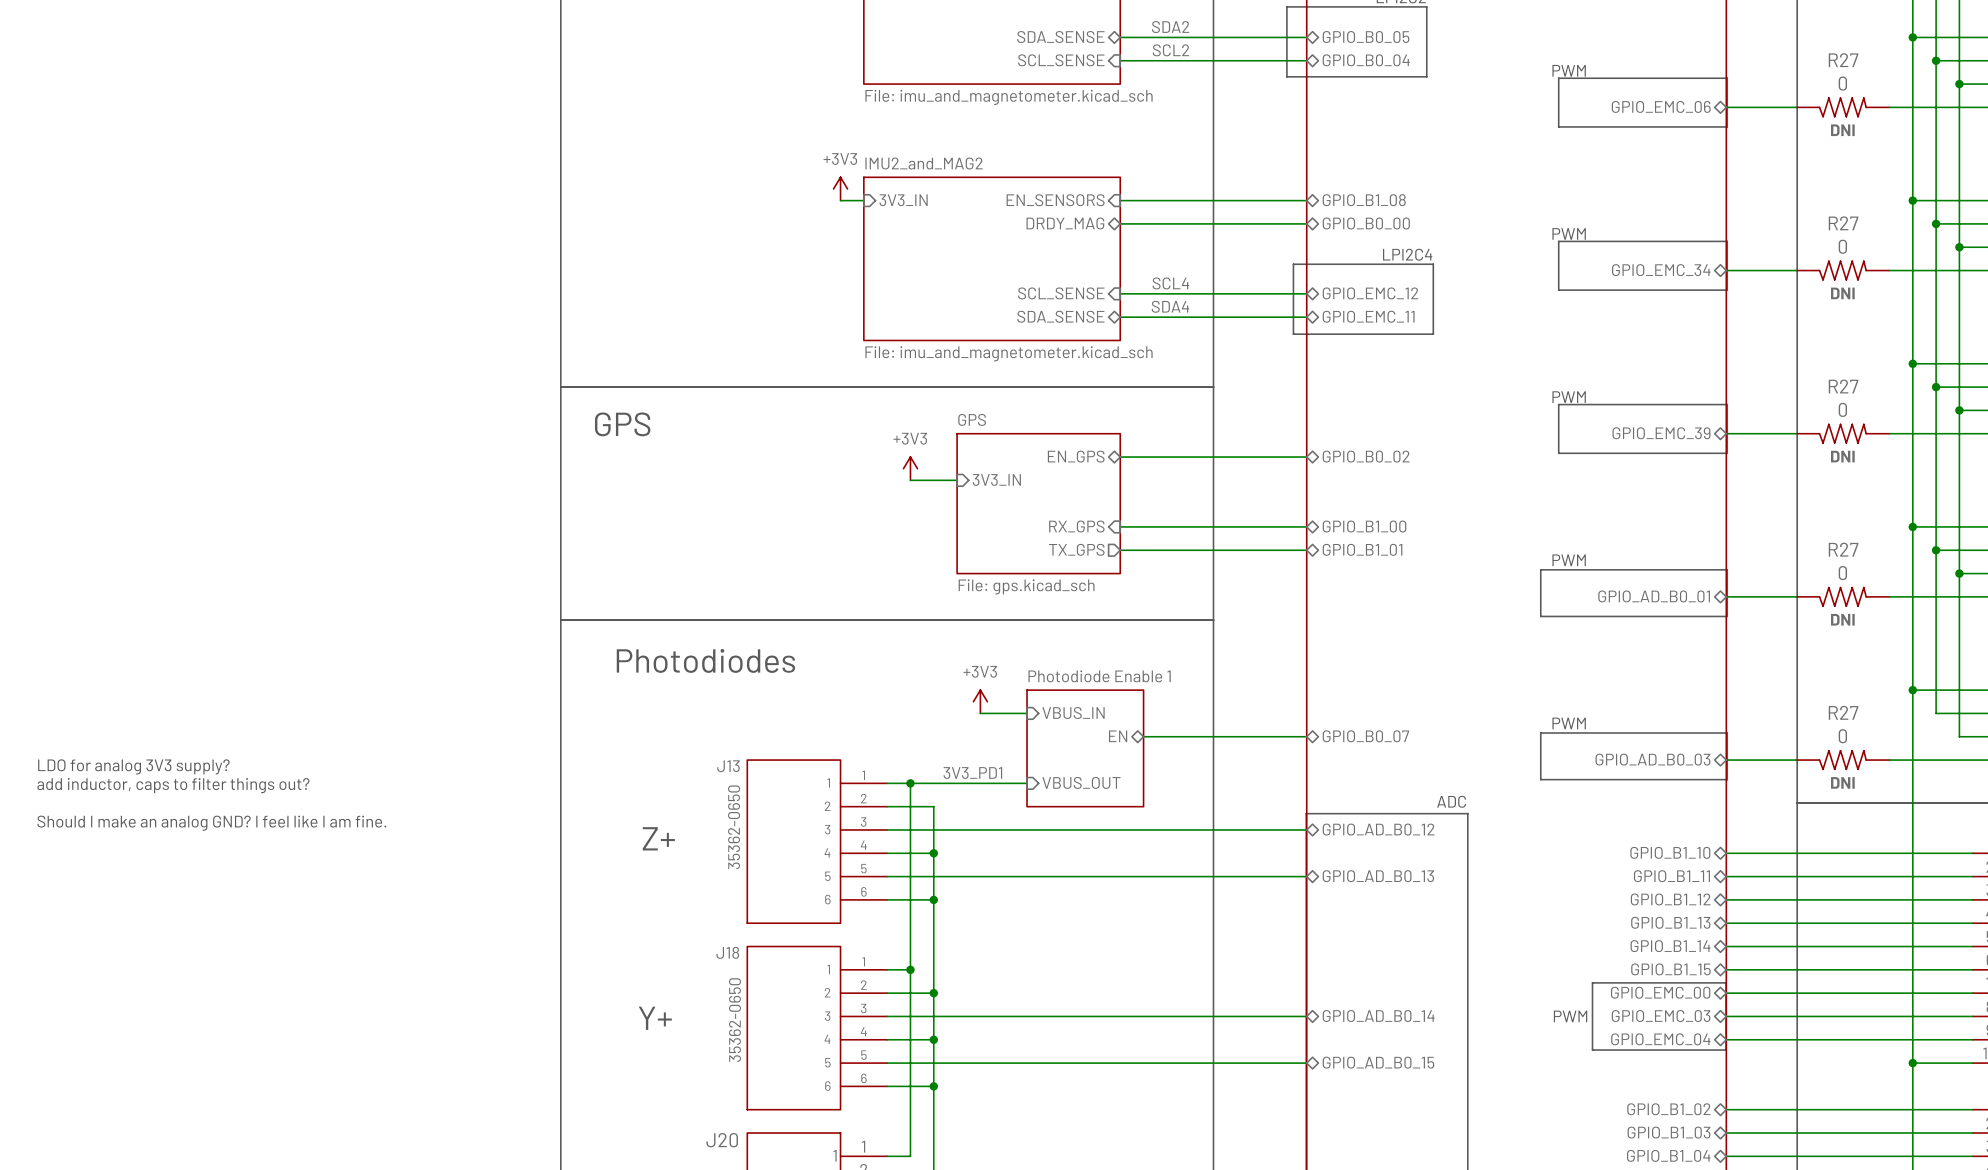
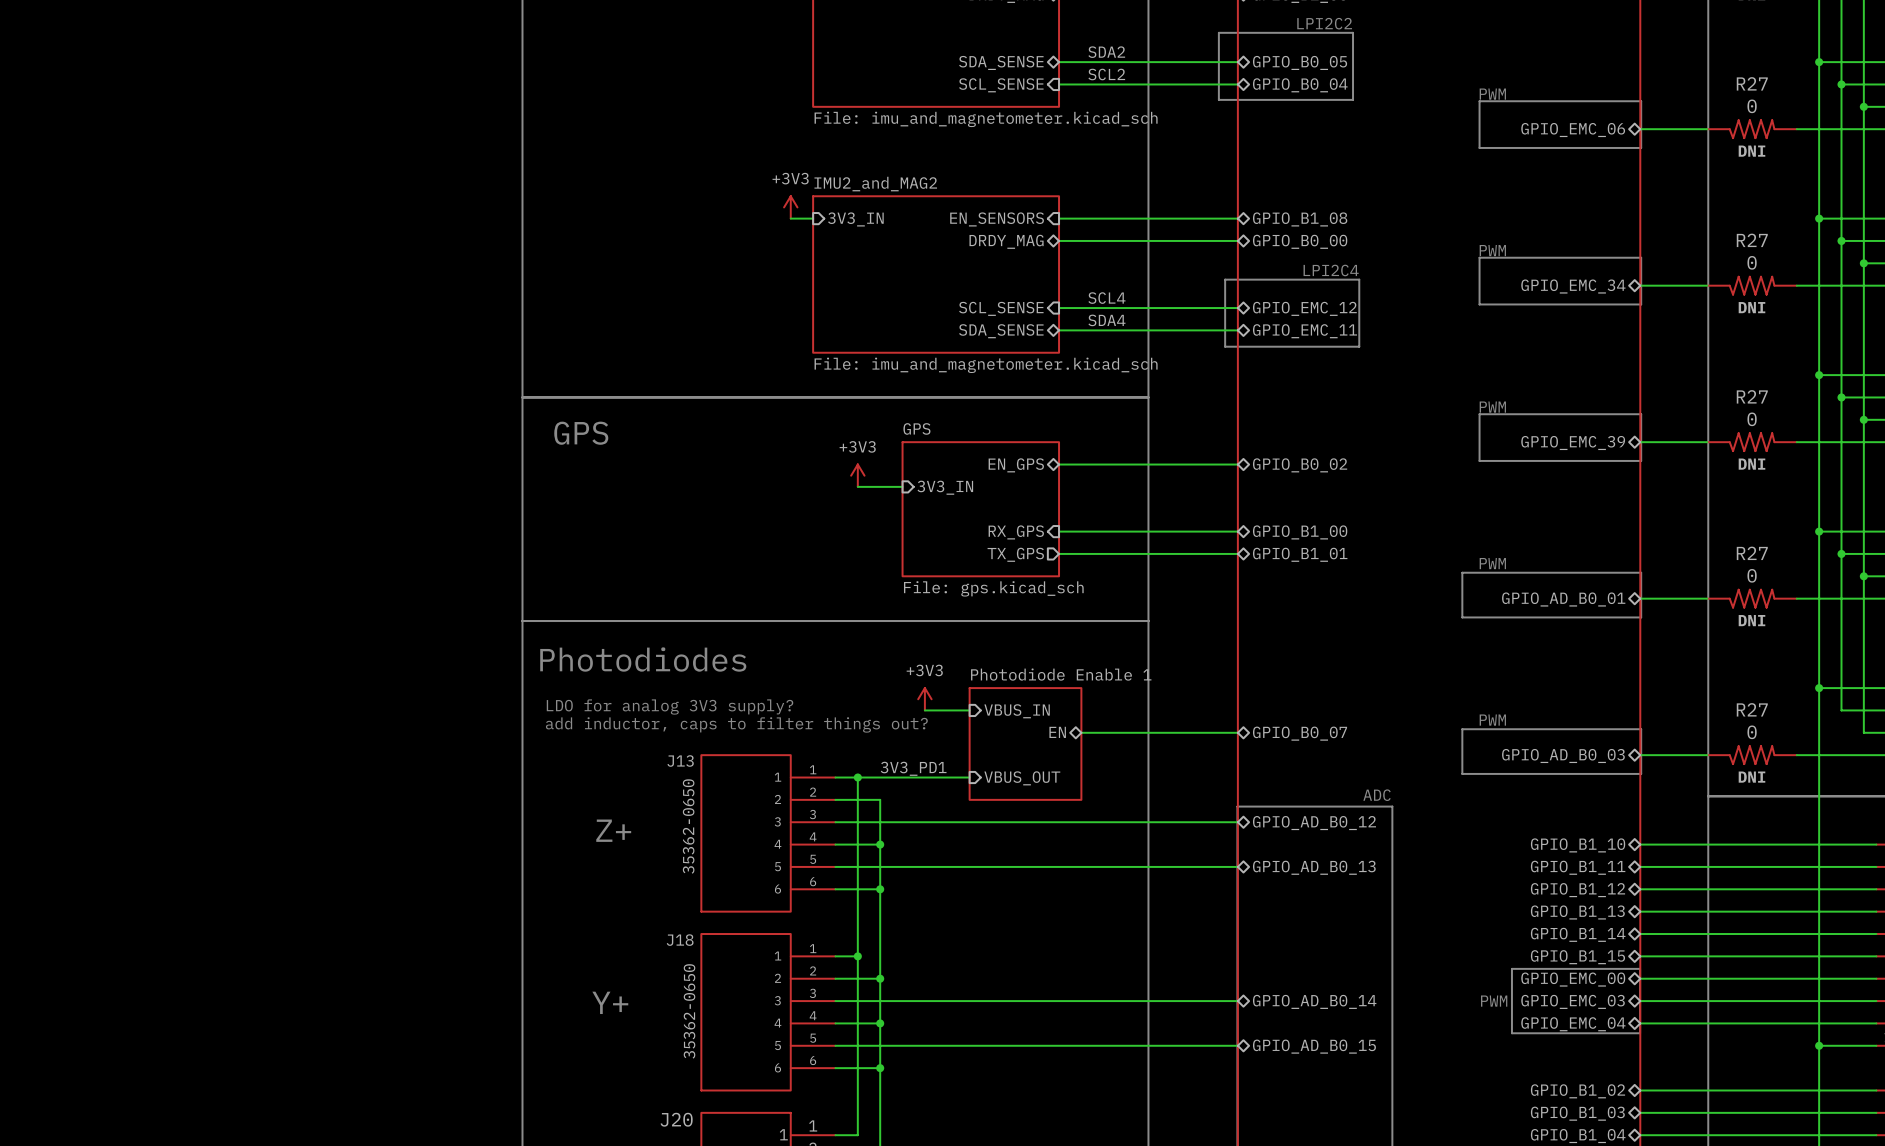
text: none -> LDO for analog 3V3 supply? (670, 707)
text: none -> add inductor, caps to filter things out? (736, 724)
text: LDO for analog 3V3 supply? (133, 766) -> none
text: add inductor, caps to filter things out? (173, 785) -> none
text: Should I make an analog GND? I feel like I am fine. (211, 823) -> none

